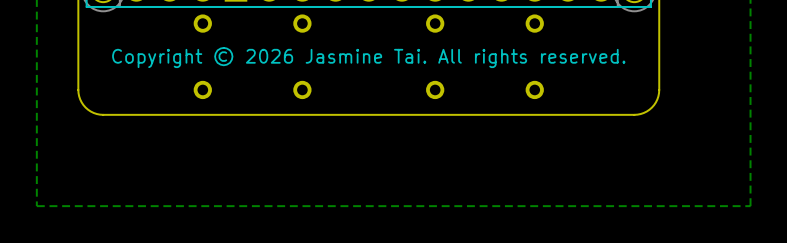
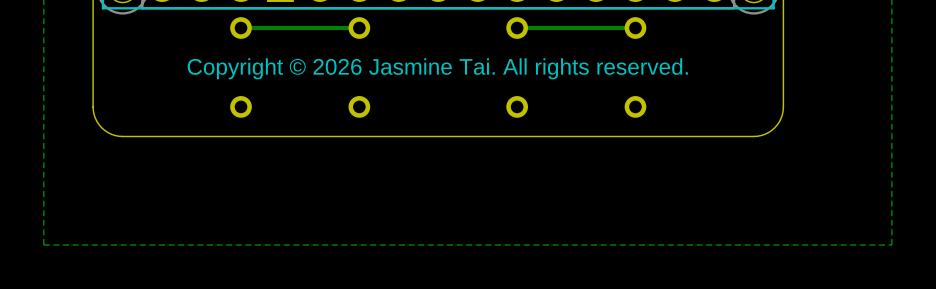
track: none -> (359, 28) (241, 28)
track: none -> (635, 28) (517, 28)

